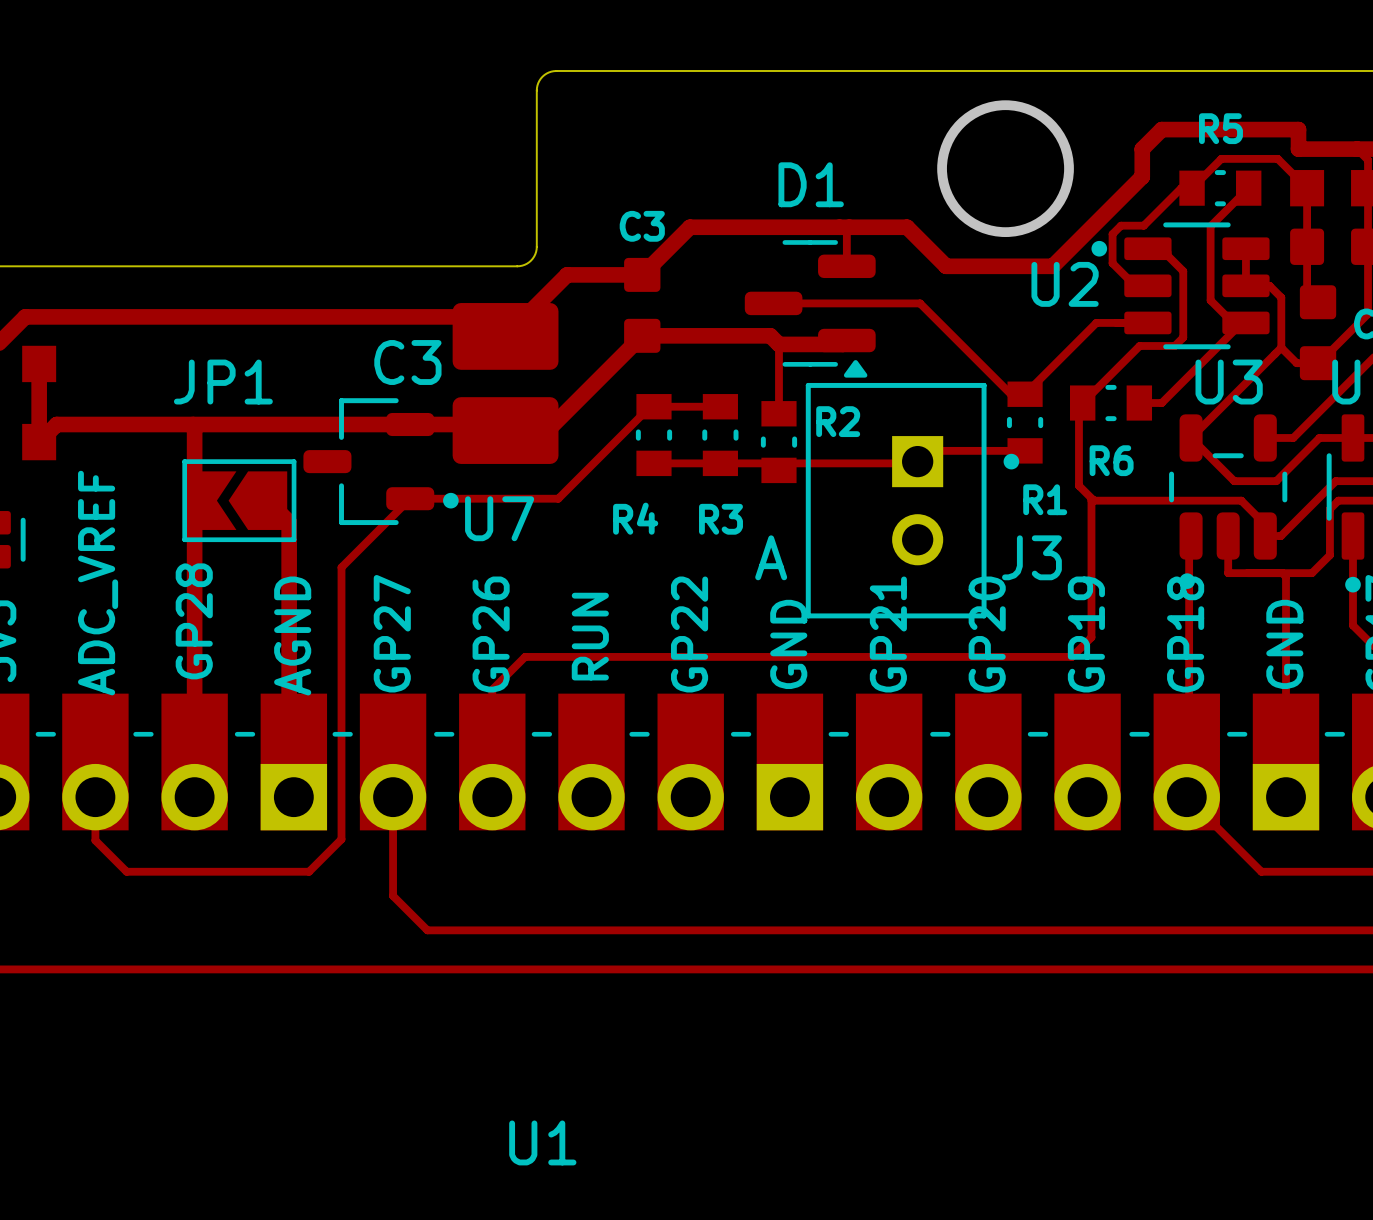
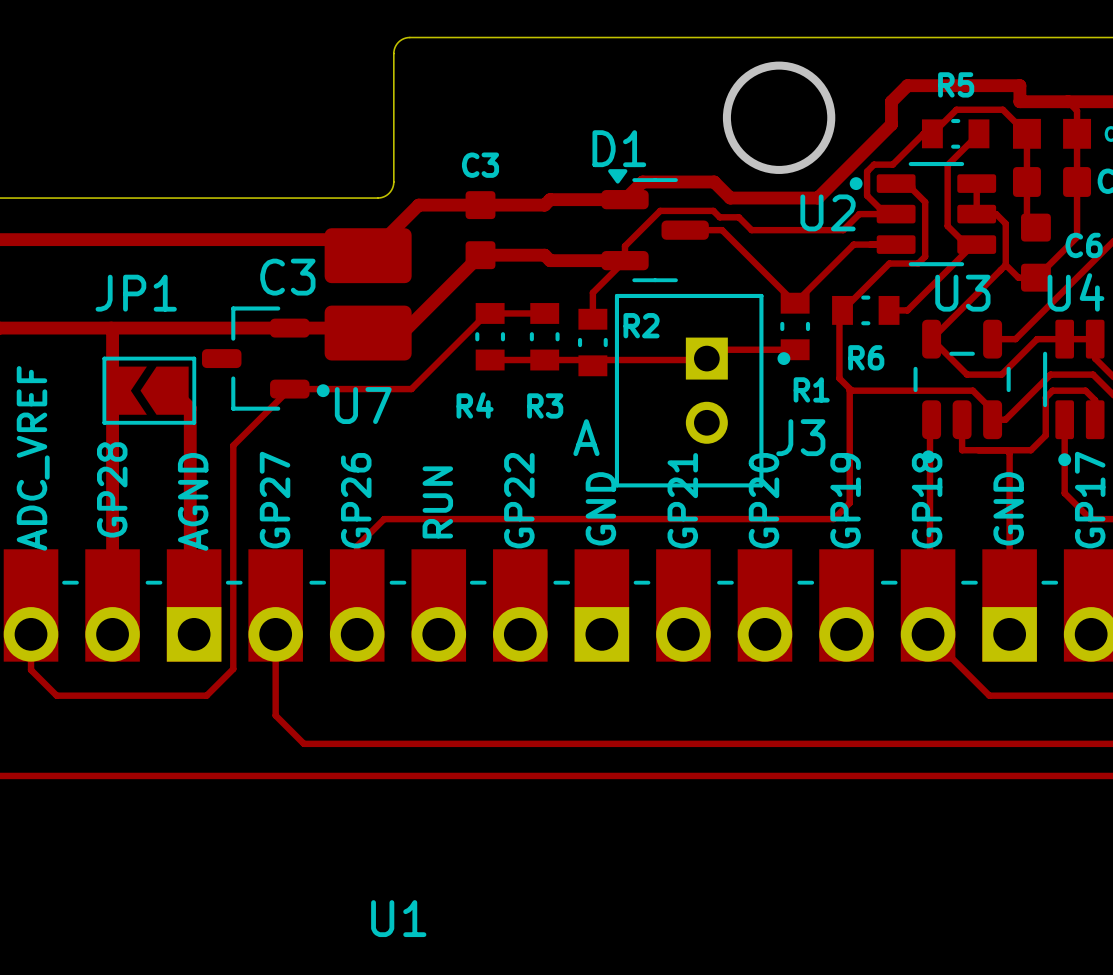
track: (849, 227) (846, 229) (846, 266) -> none
track: (926, 246) (907, 227) (689, 227) (642, 274) -> (714, 181) (642, 181) (624, 199) (550, 199) (544, 205) (480, 205)
track: none -> (885, 214) (859, 214) (843, 230) (751, 230) (738, 217) (719, 217) (713, 210) (660, 210) (624, 246) (624, 260)
track: (773, 303) (920, 303) (1010, 394) (1025, 394) -> (685, 230) (722, 230) (795, 303)
D1 rotation: 0° (810, 308) -> 180° (655, 225)
track: (720, 335) (770, 335) (778, 344) -> (544, 255) (550, 260) (624, 260)
track: (846, 342) (846, 340) (842, 344) (778, 344) -> none
track: (778, 344) (778, 381) -> (624, 260) (592, 292)

